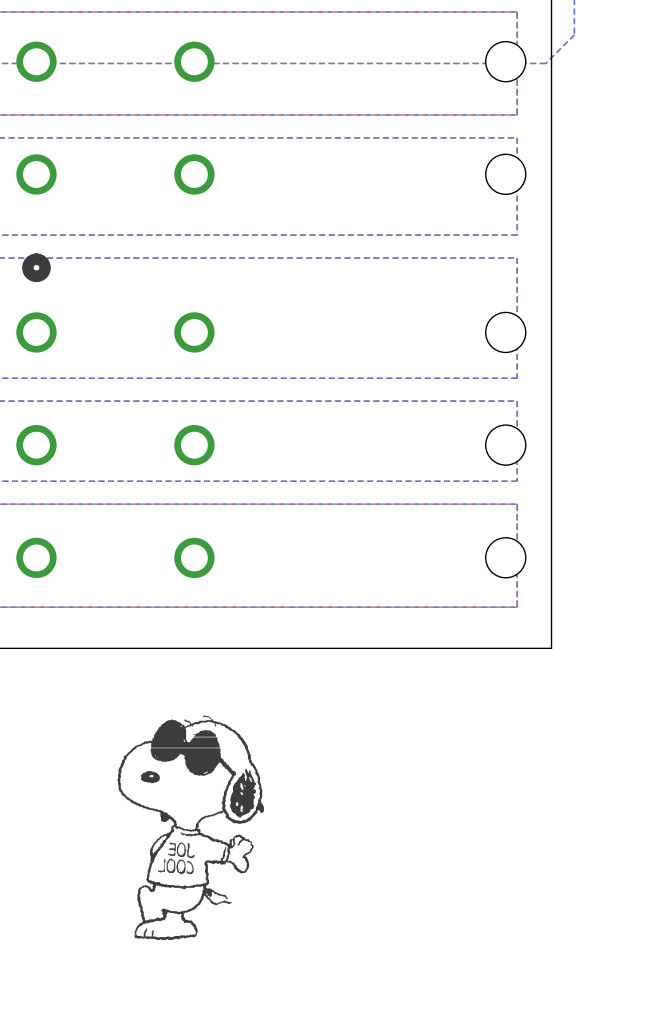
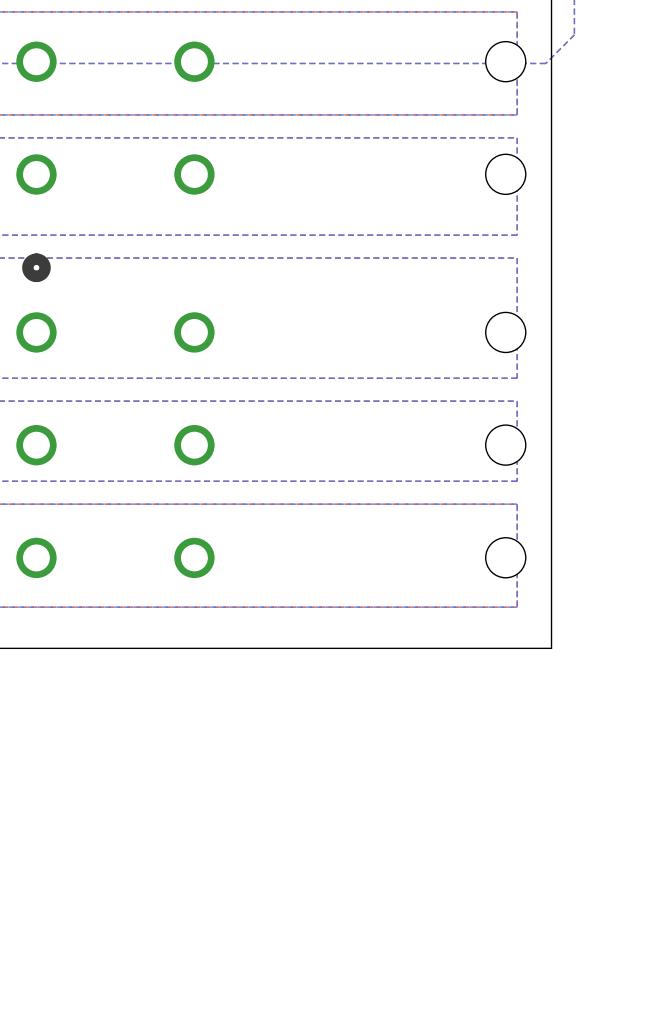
drawing: [117, 715, 264, 940] -> none

